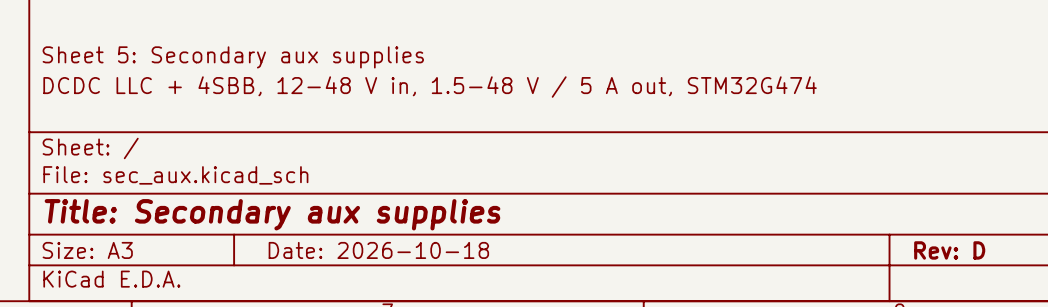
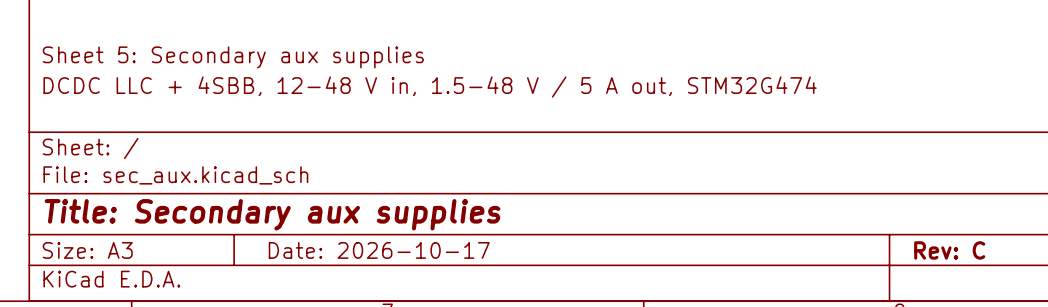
title block: Date: 2026-10-18 (378, 250) -> Date: 2026-10-17 (379, 250)
title block: Rev: D (949, 250) -> Rev: C (949, 250)

